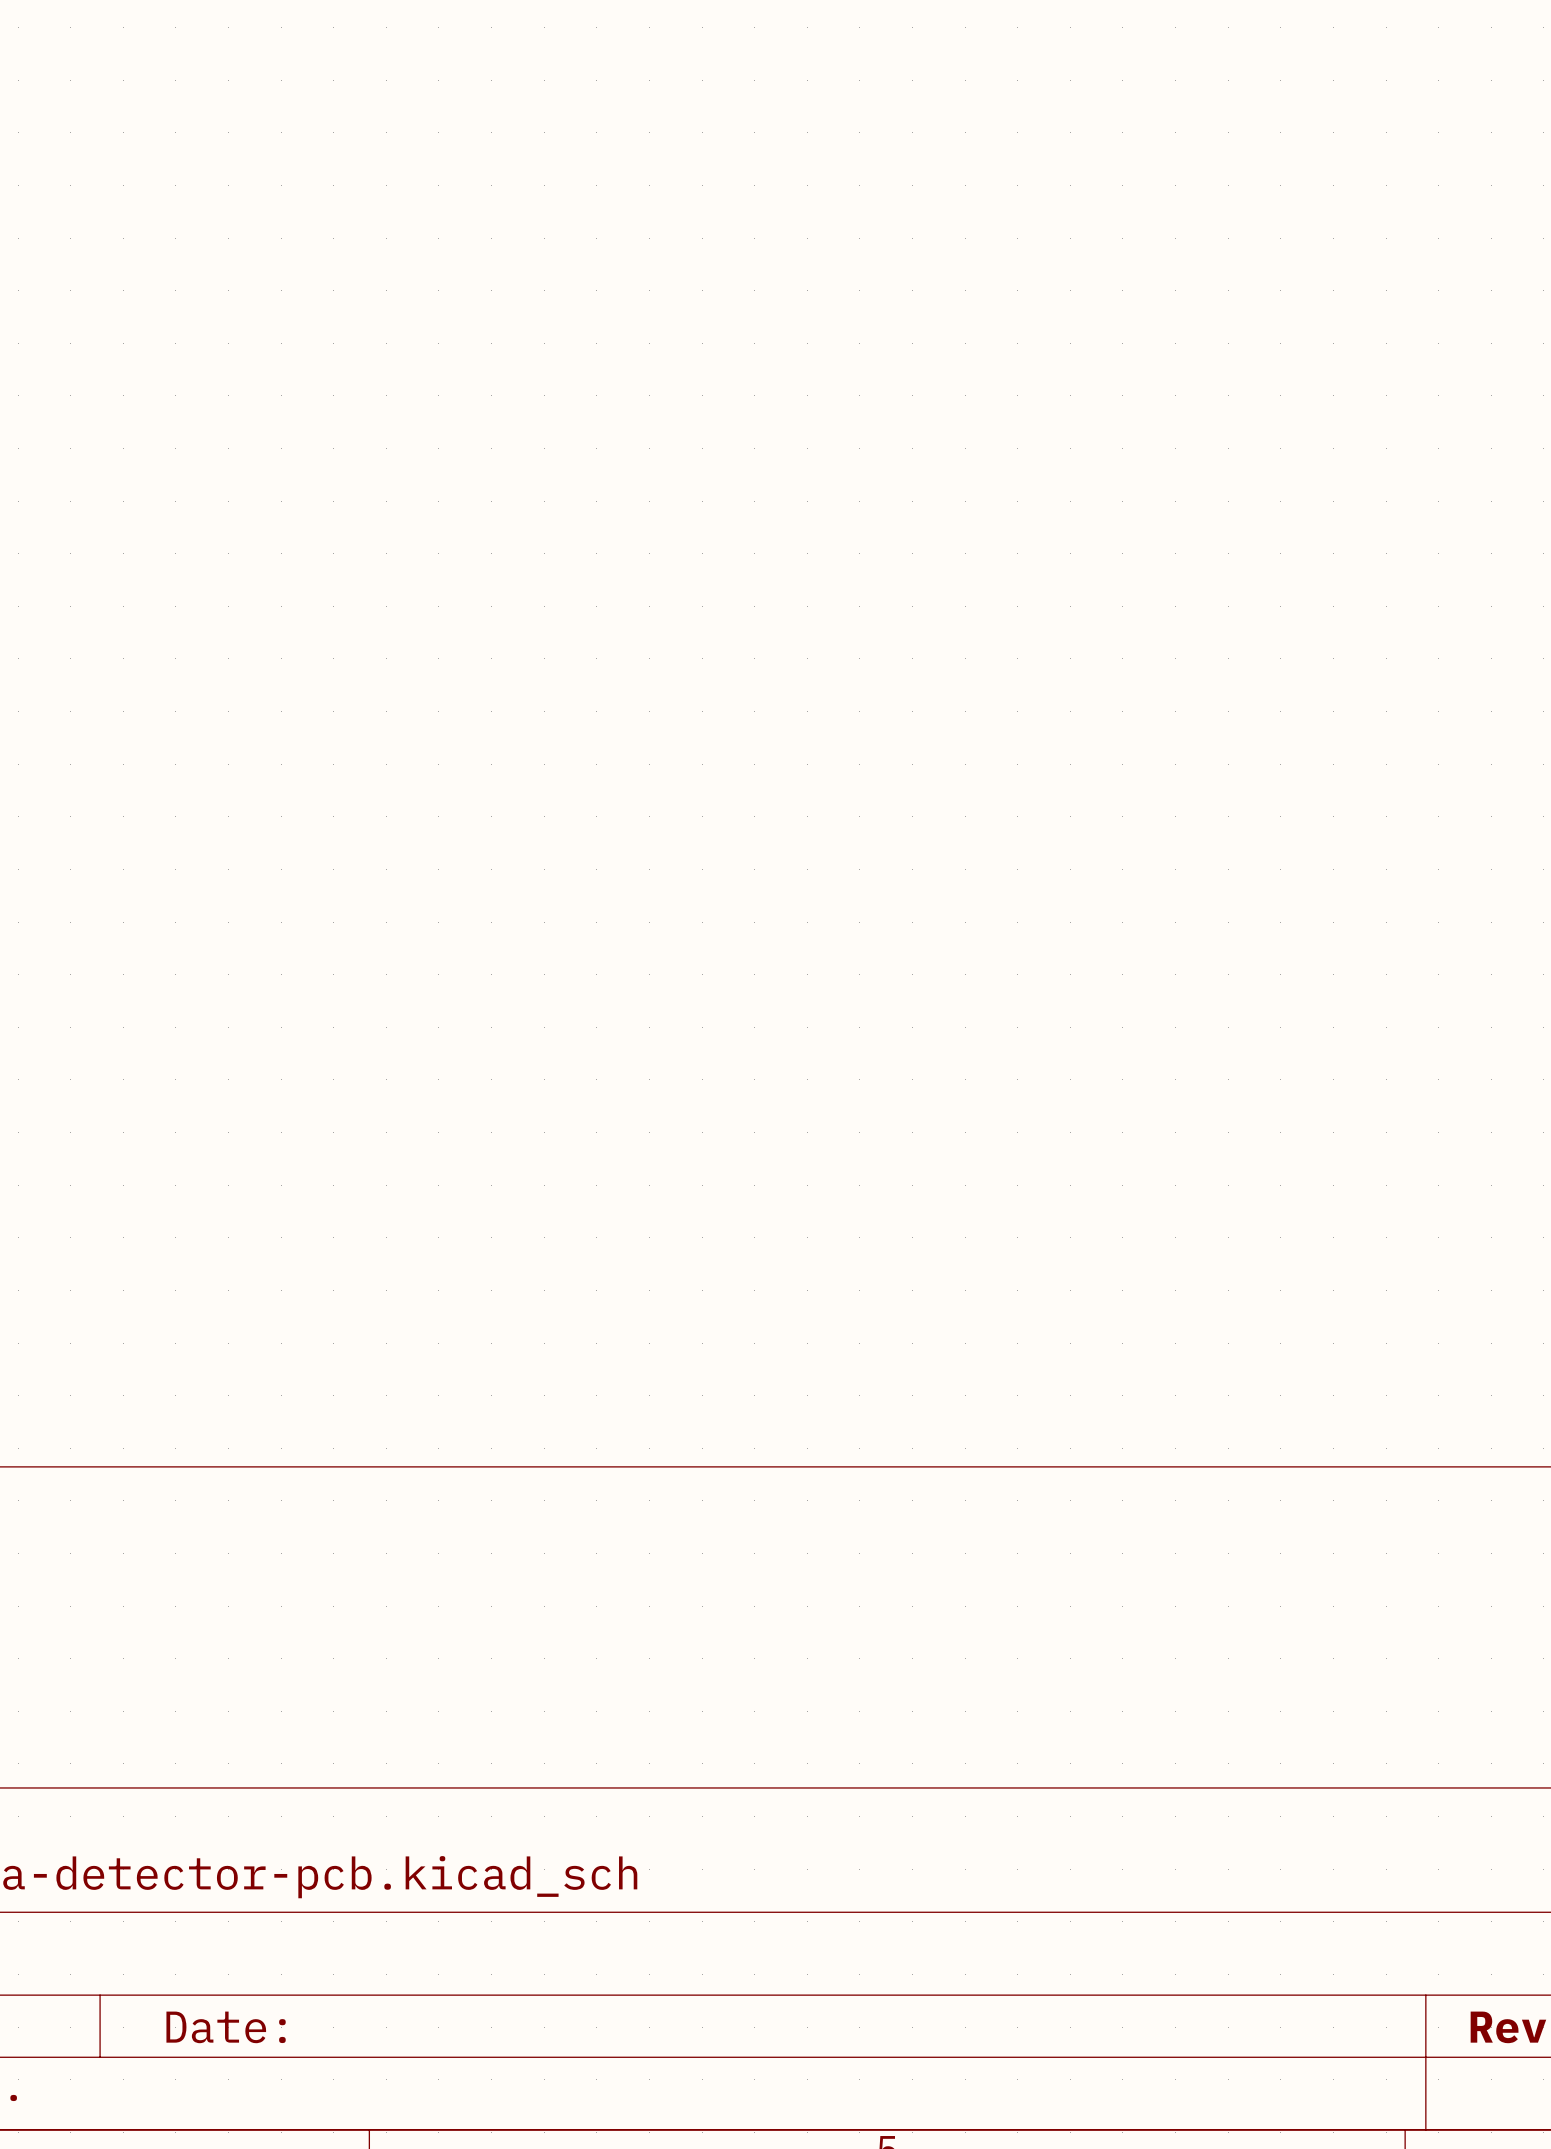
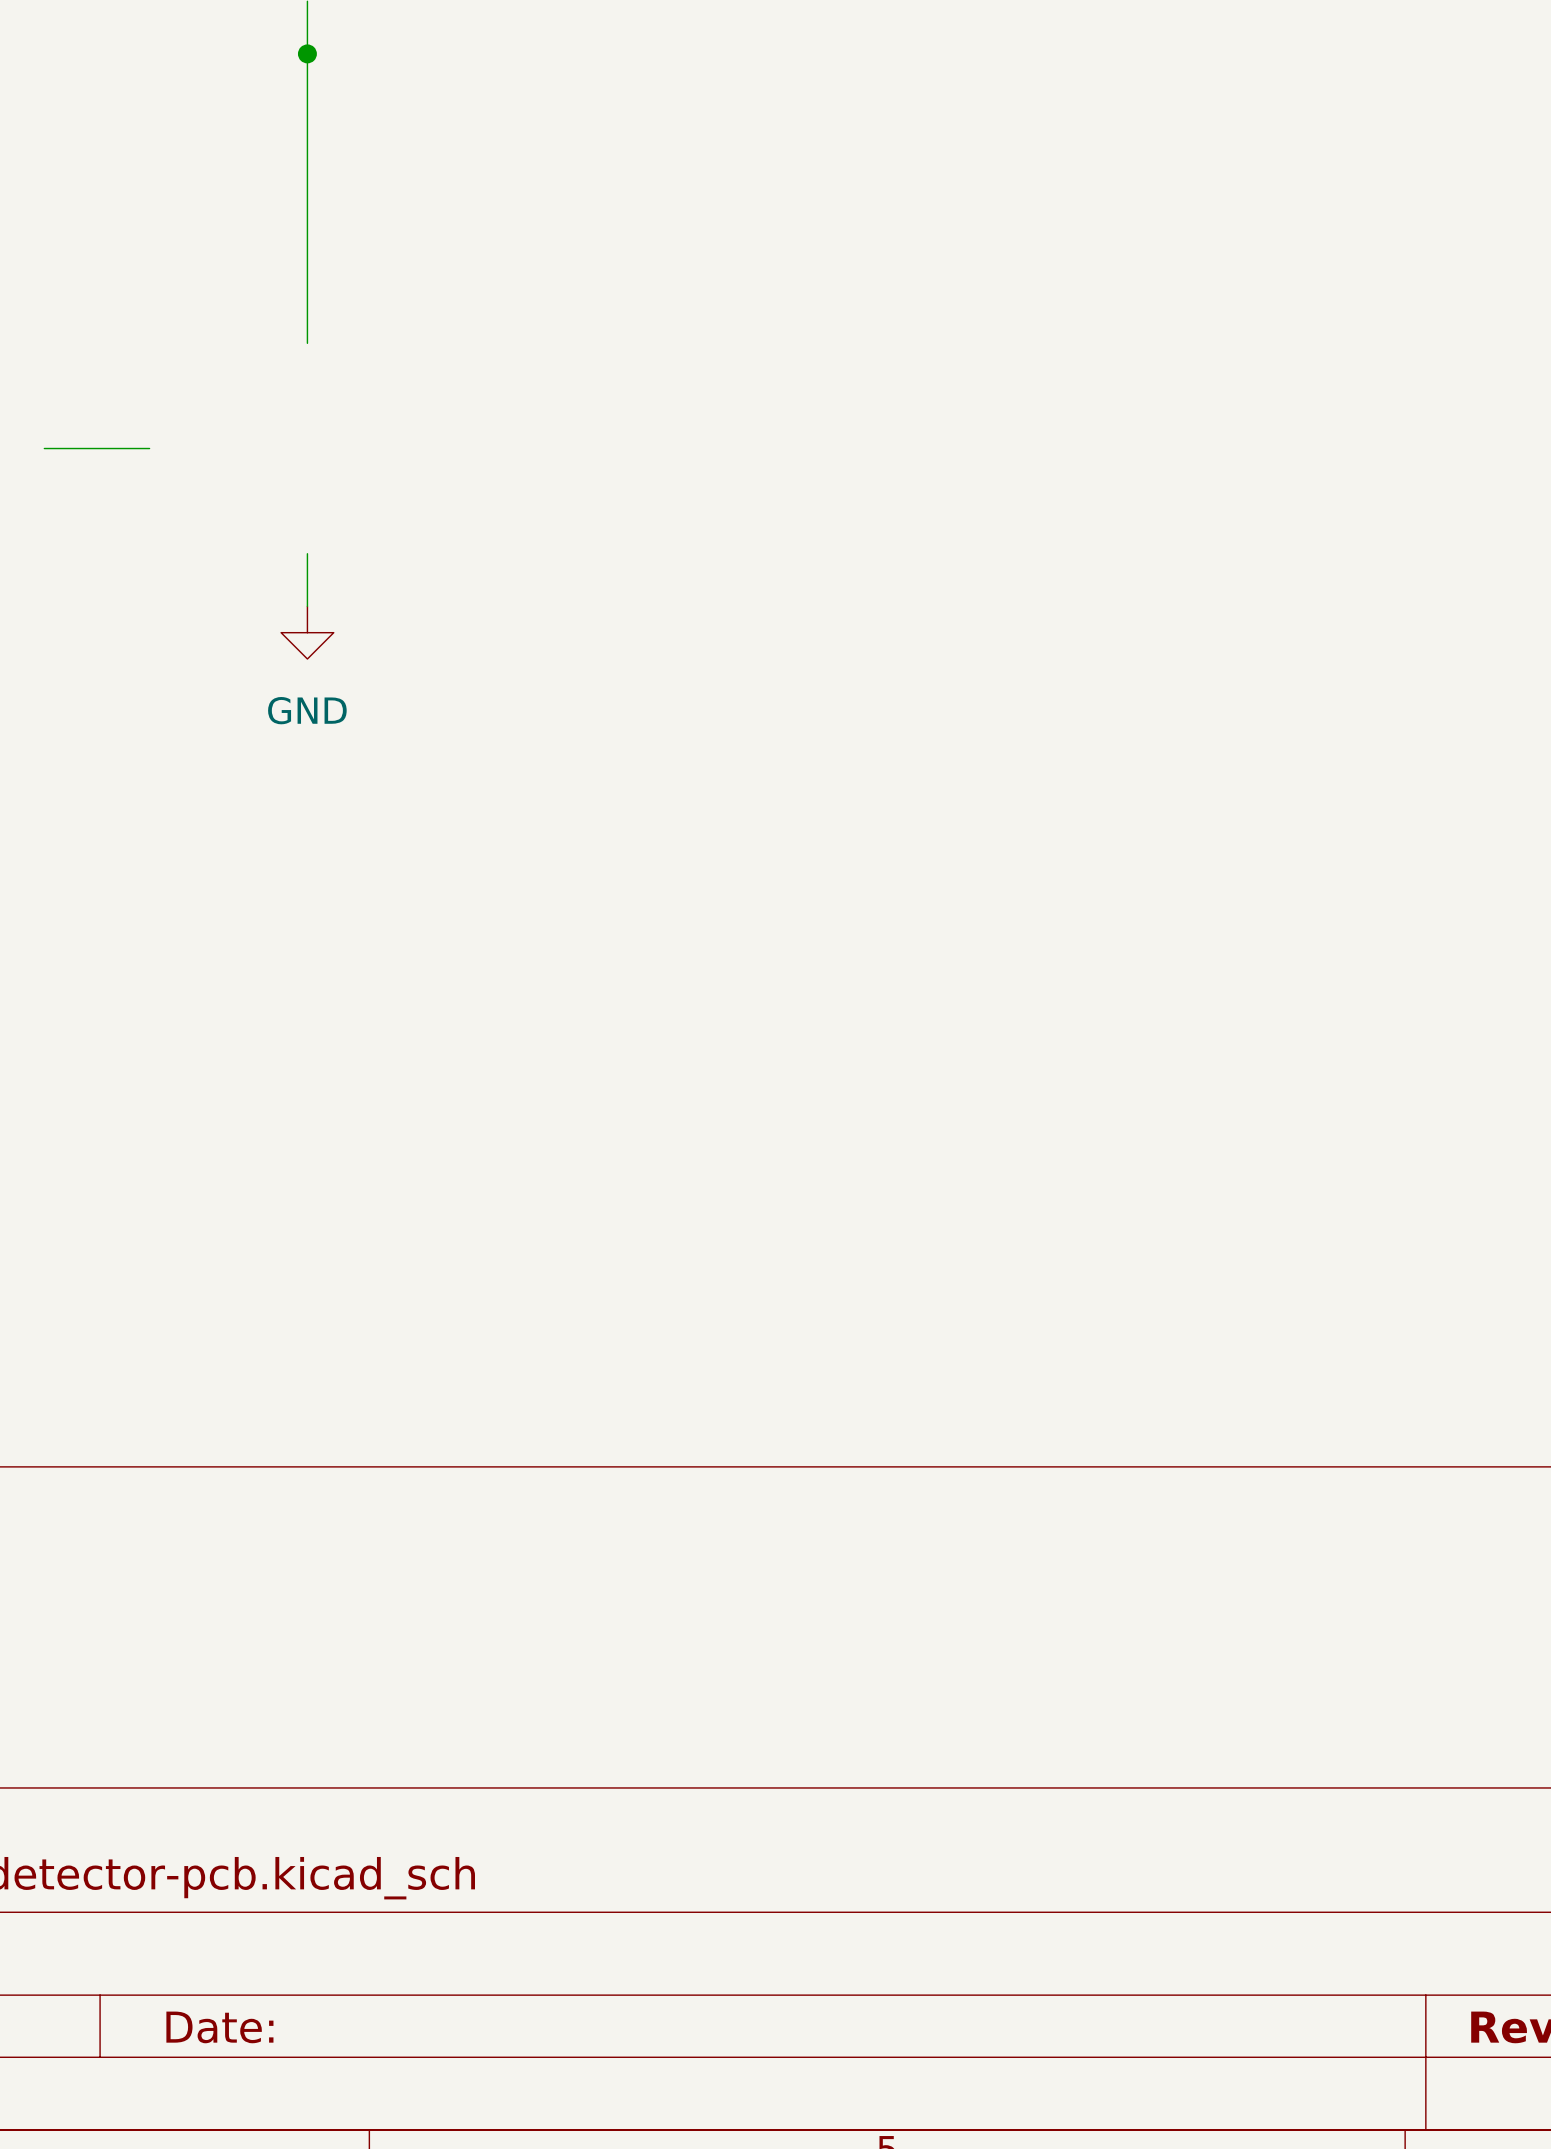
wire: none -> (307, 1) (307, 343)
junction: none -> (307, 53)
wire: none -> (44, 448) (149, 448)
wire: none -> (307, 553) (307, 606)
power symbol: none -> GND (307, 632)

